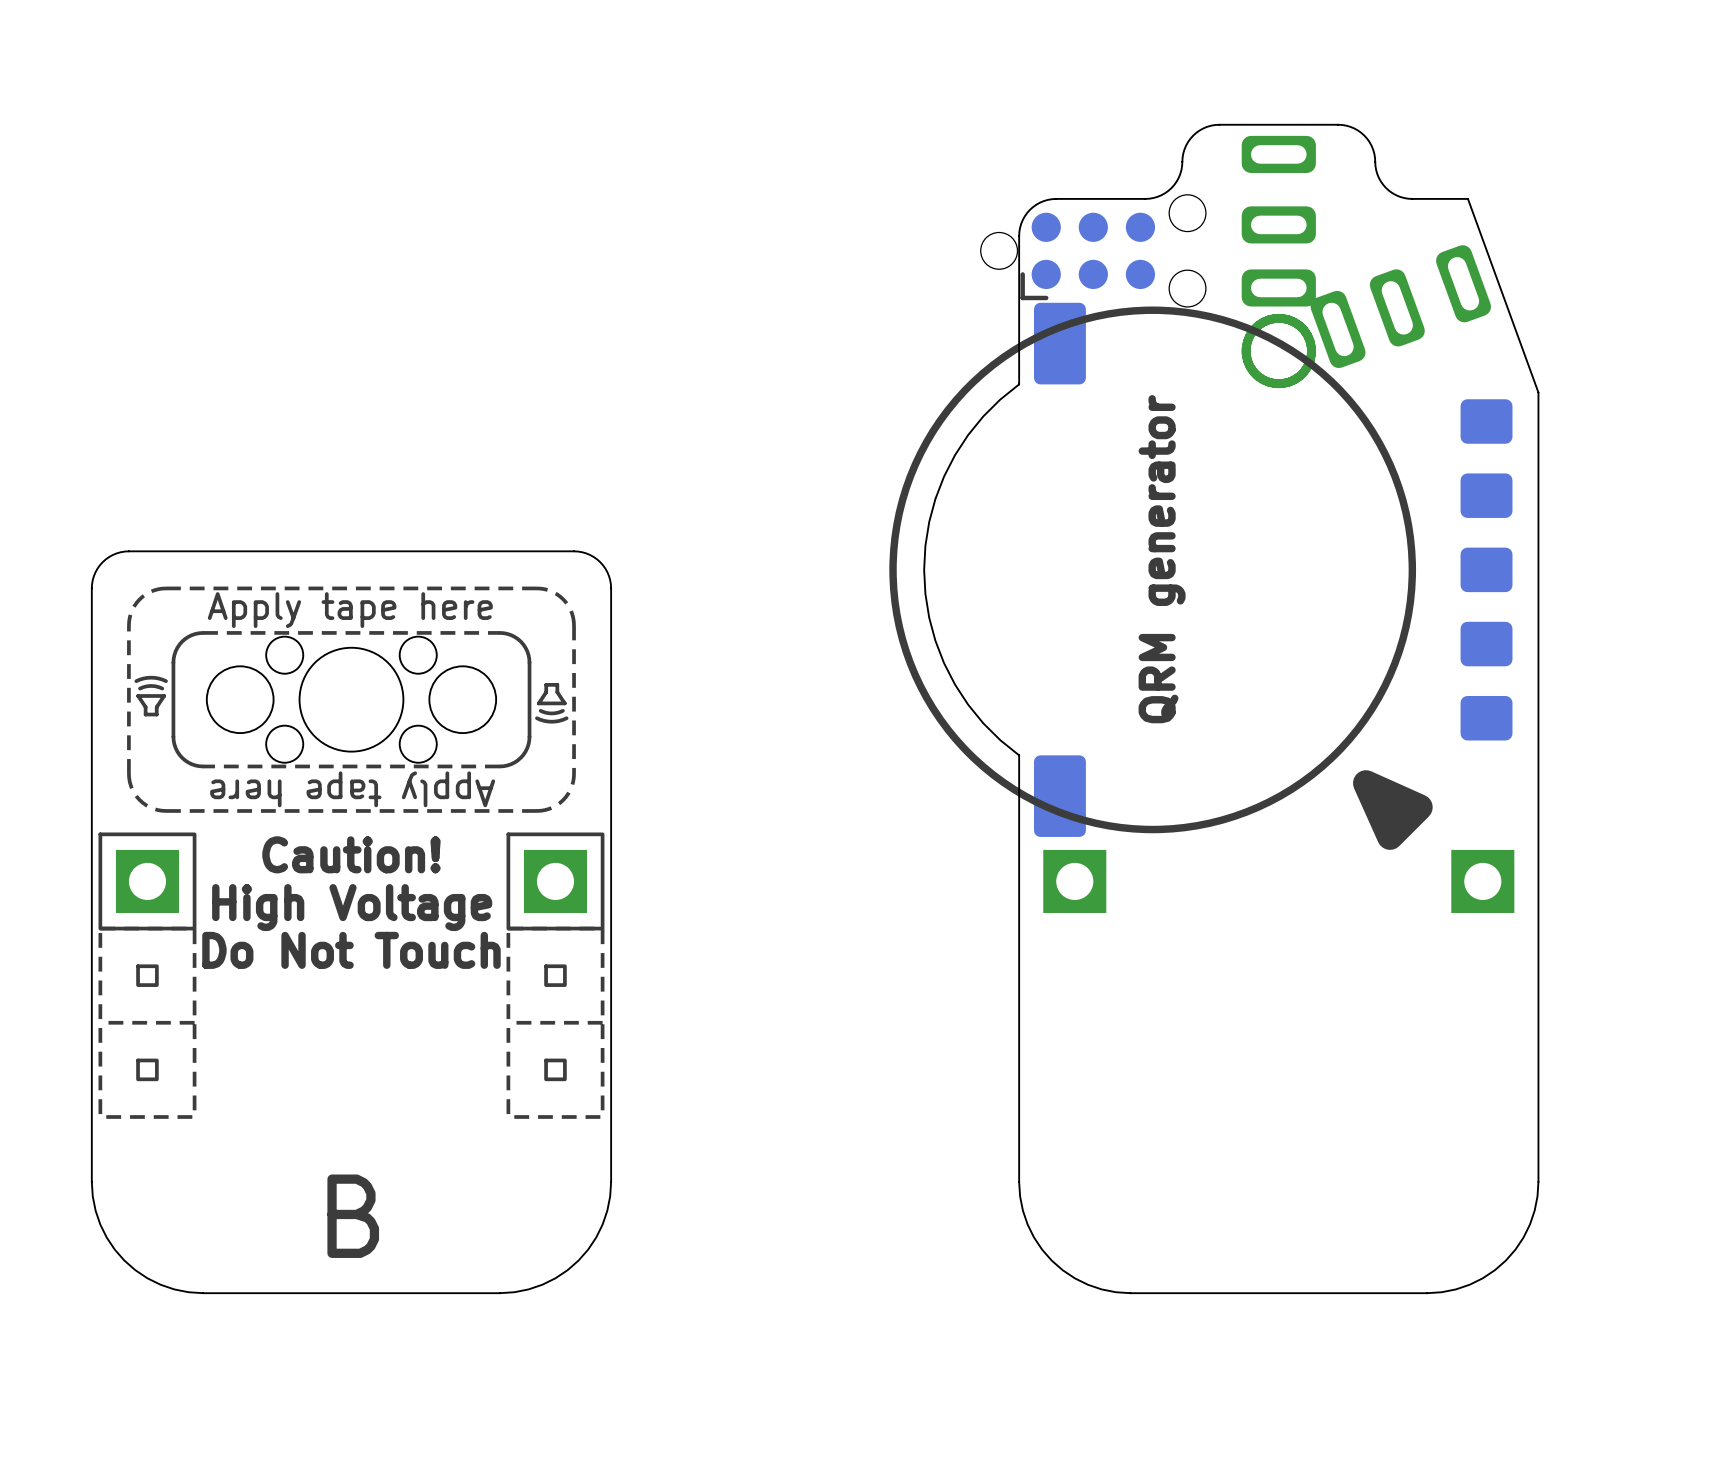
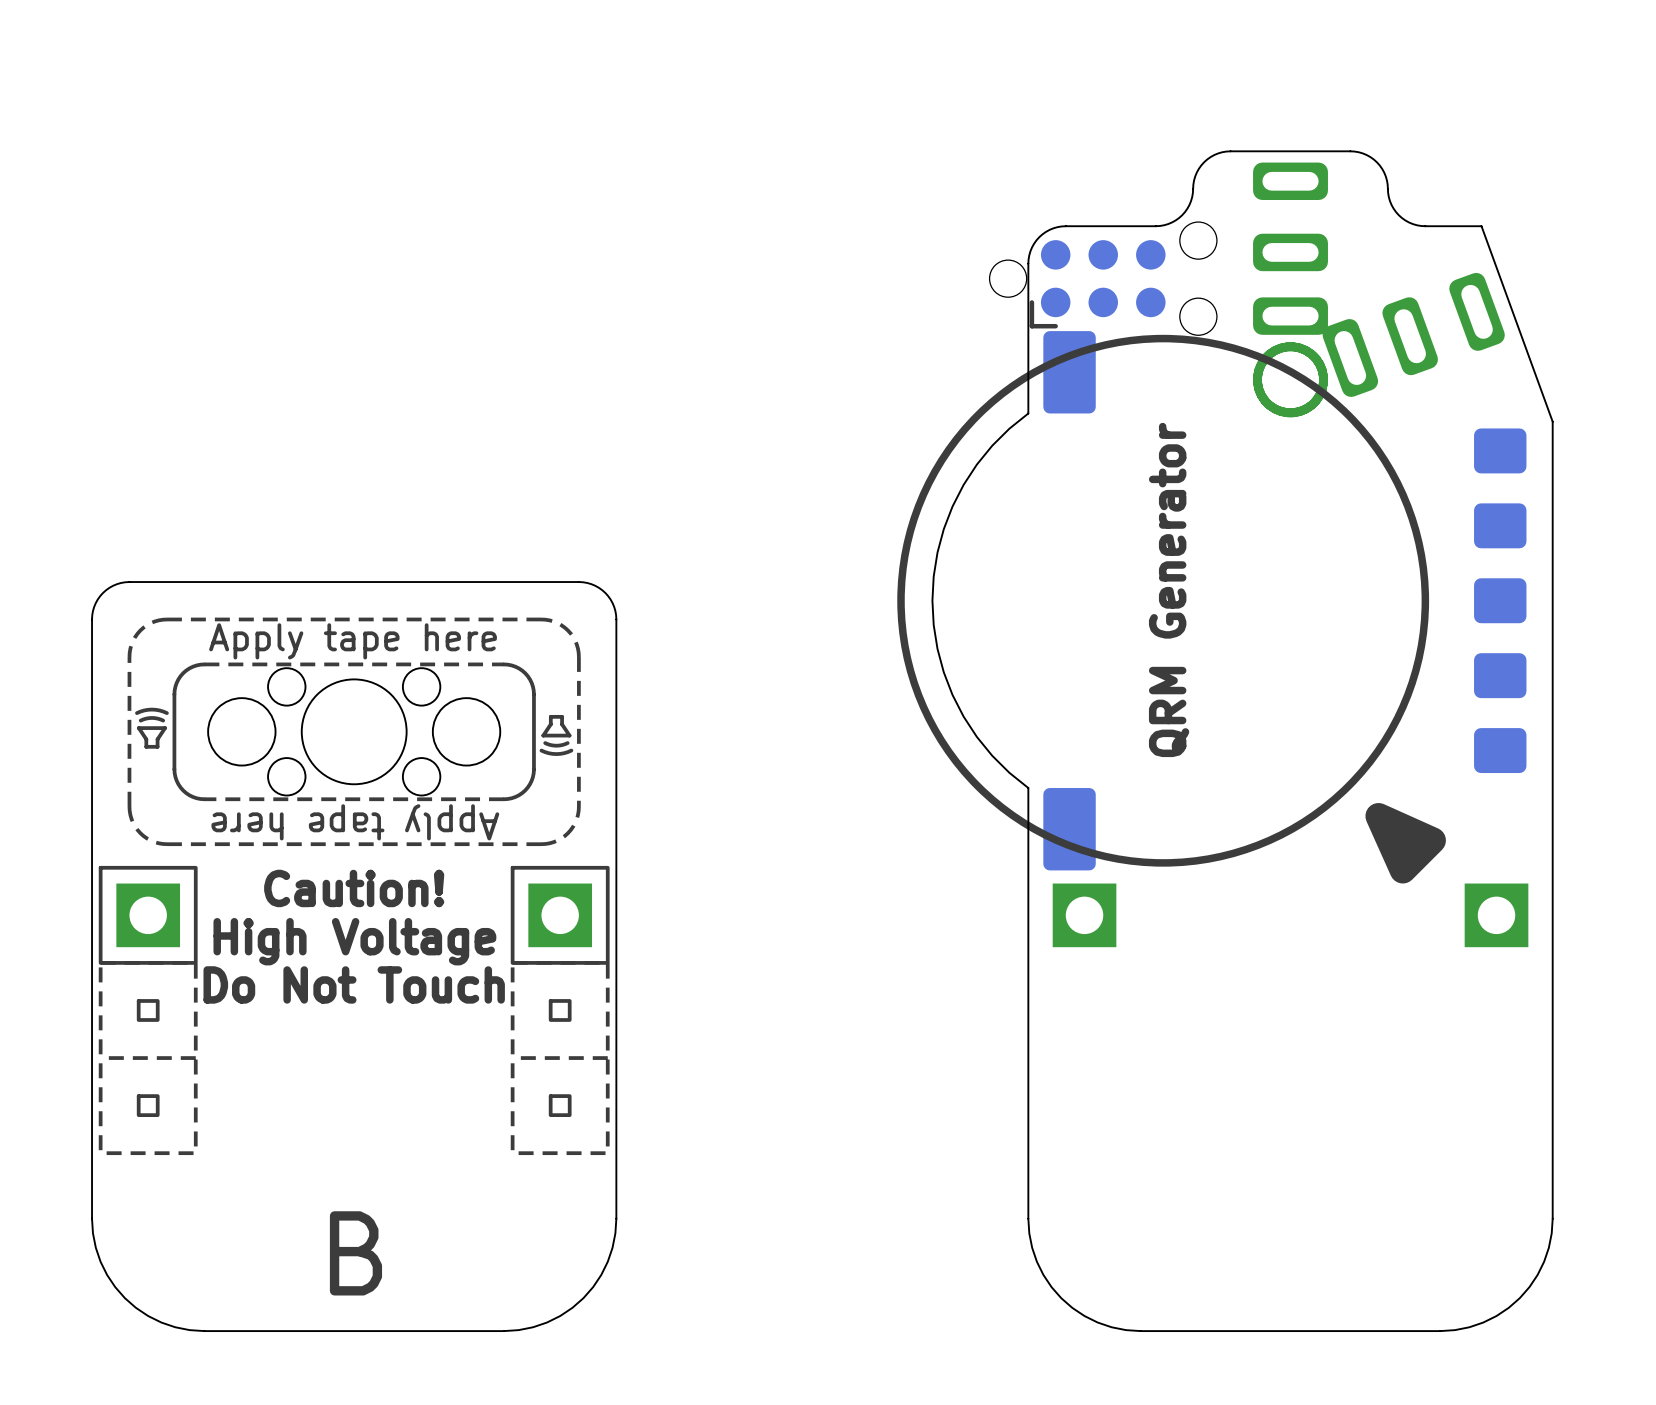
text: QRM generator (1162, 559) -> QRM Generator (1169, 589)

